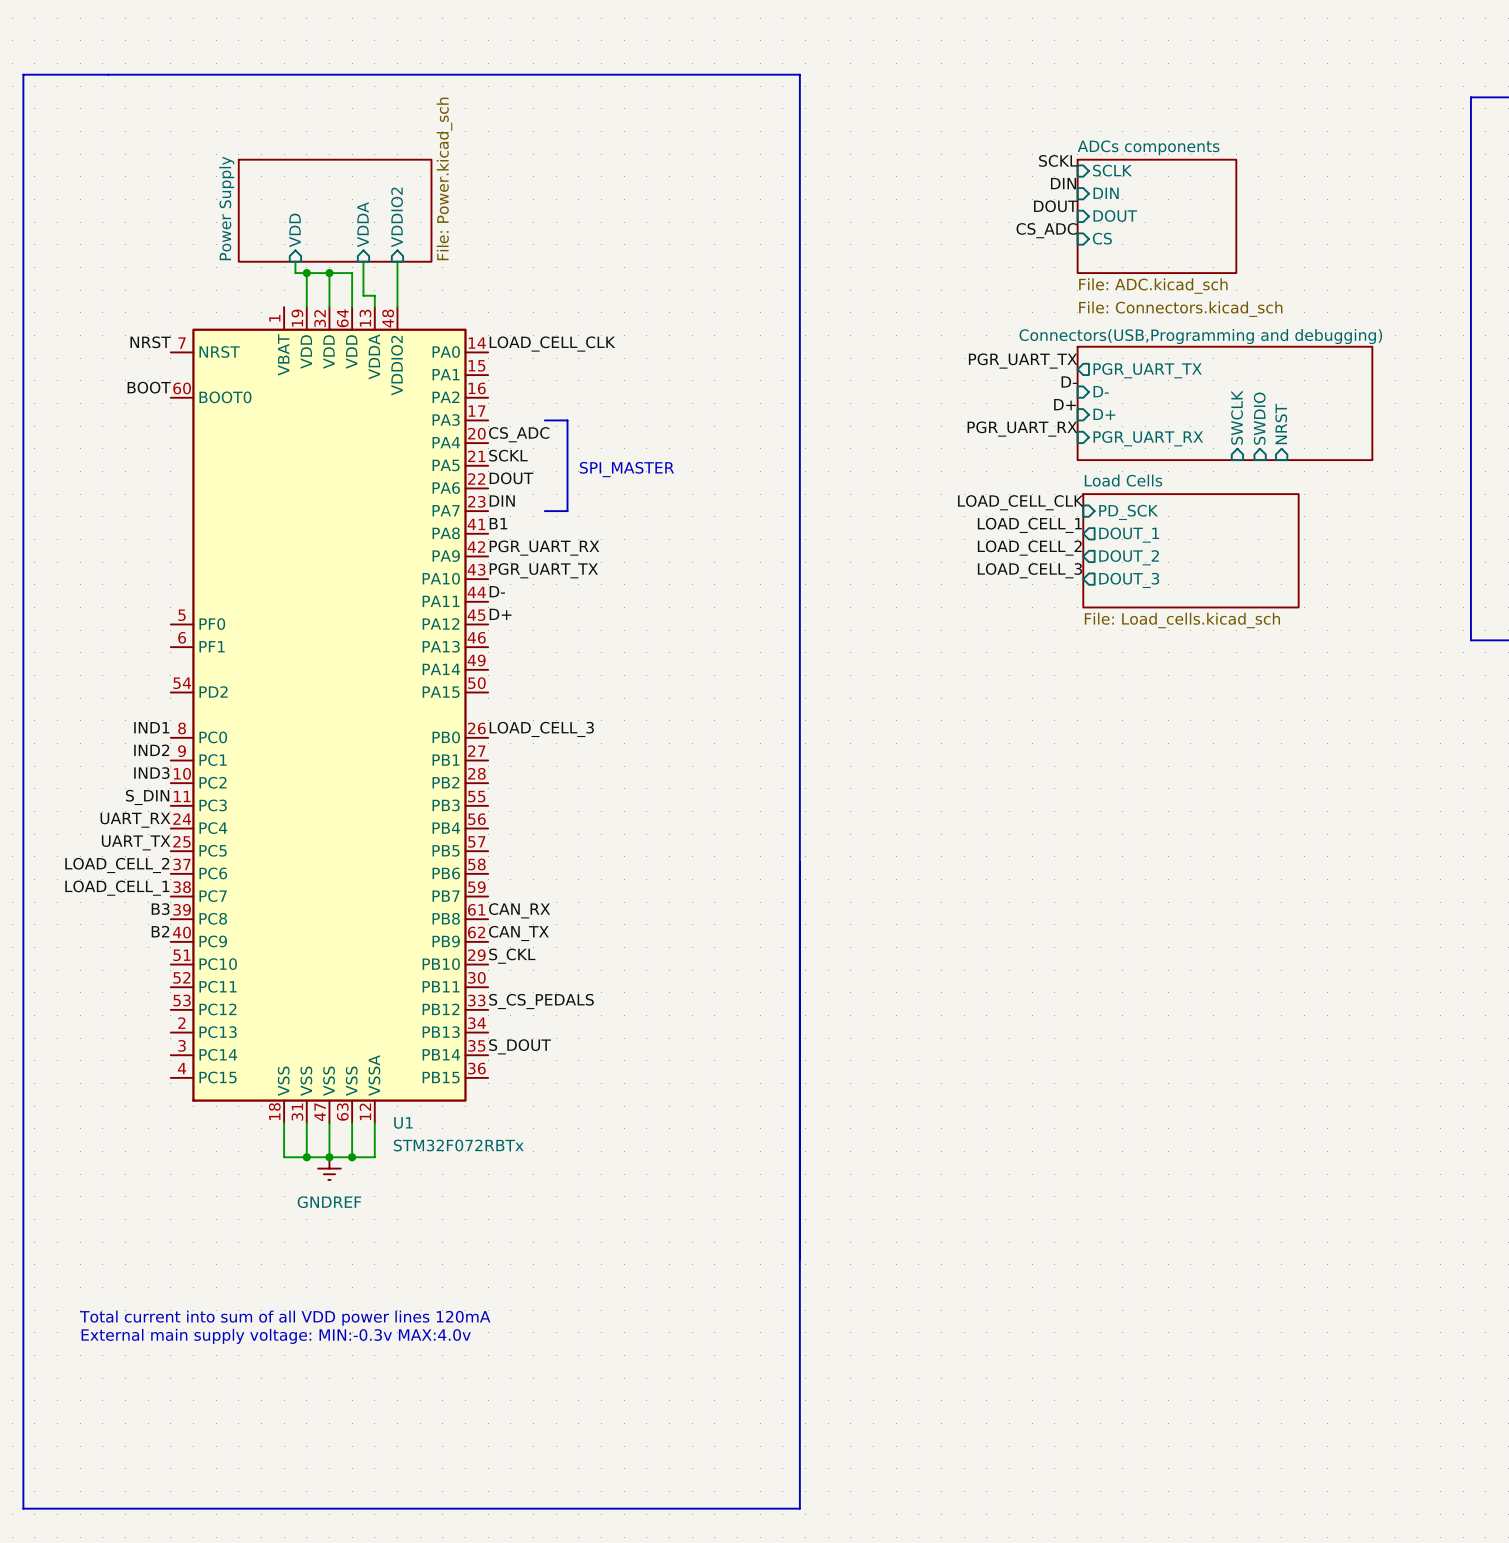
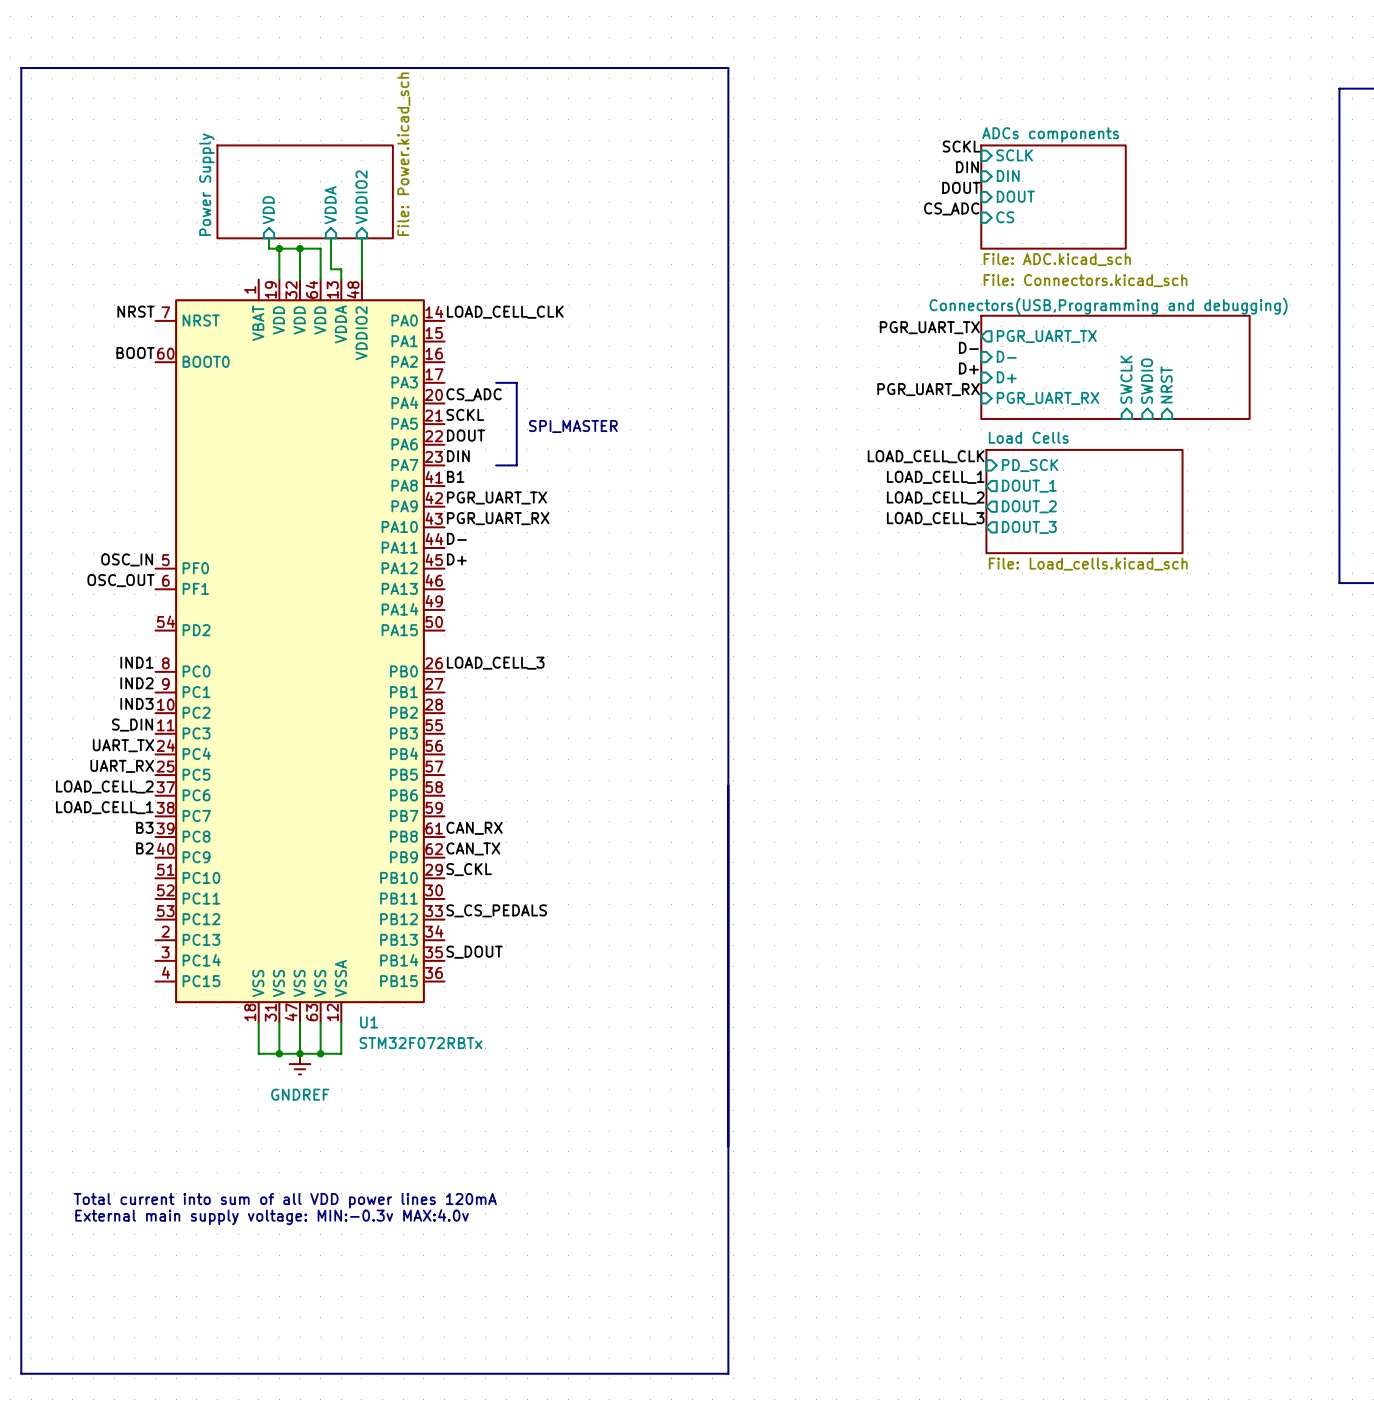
label: PGR_UART_RX (544, 548) -> PGR_UART_TX (496, 497)
label: PGR_UART_TX (543, 570) -> PGR_UART_RX (498, 518)
label: none -> OSC_IN (127, 559)
label: none -> OSC_OUT (121, 580)
label: UART_RX (135, 820) -> UART_TX (123, 745)
label: UART_TX (136, 842) -> UART_RX (122, 766)

